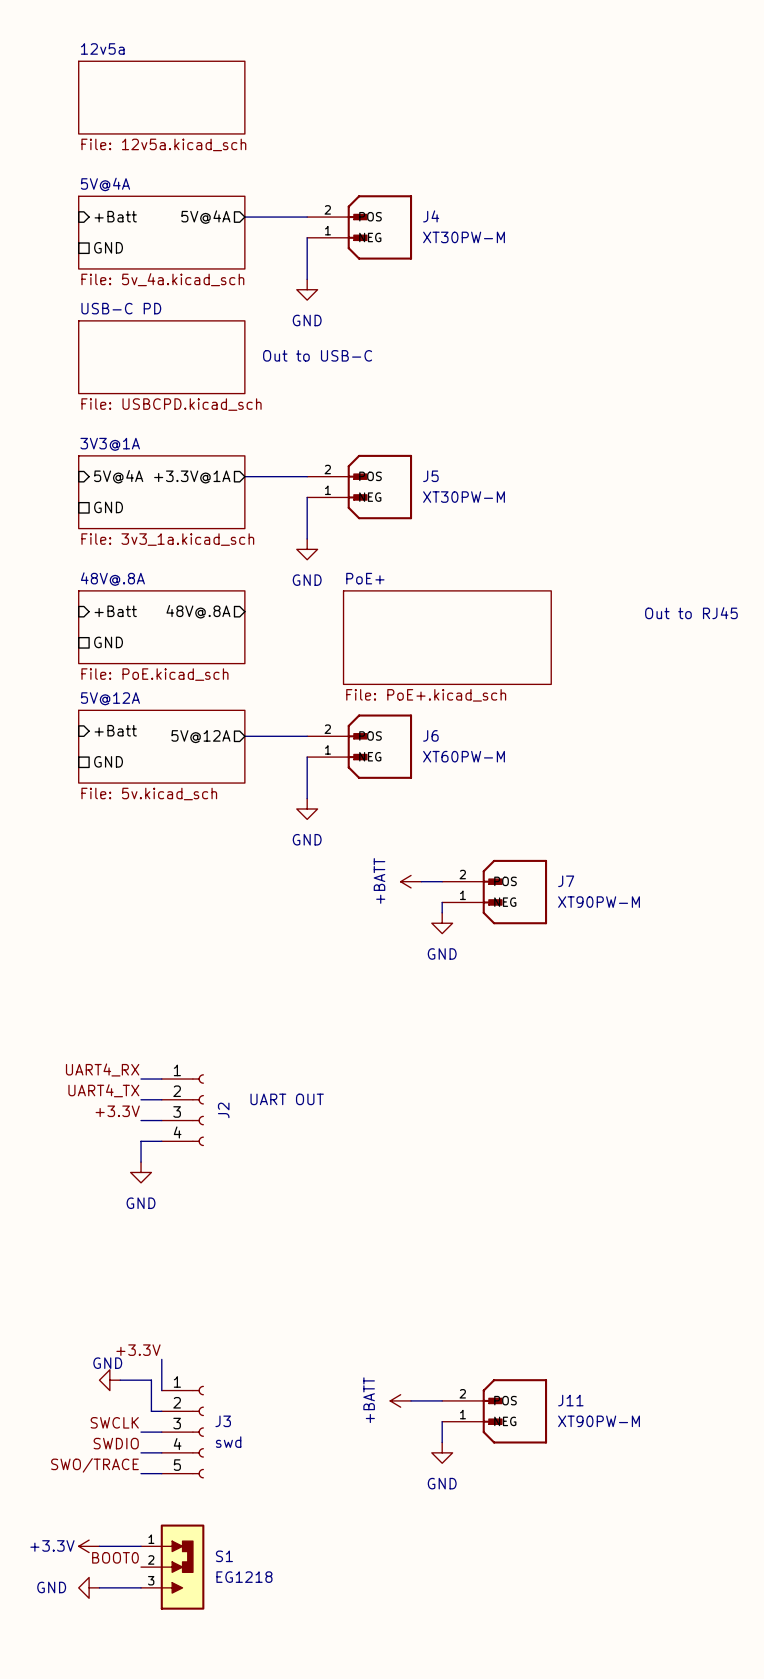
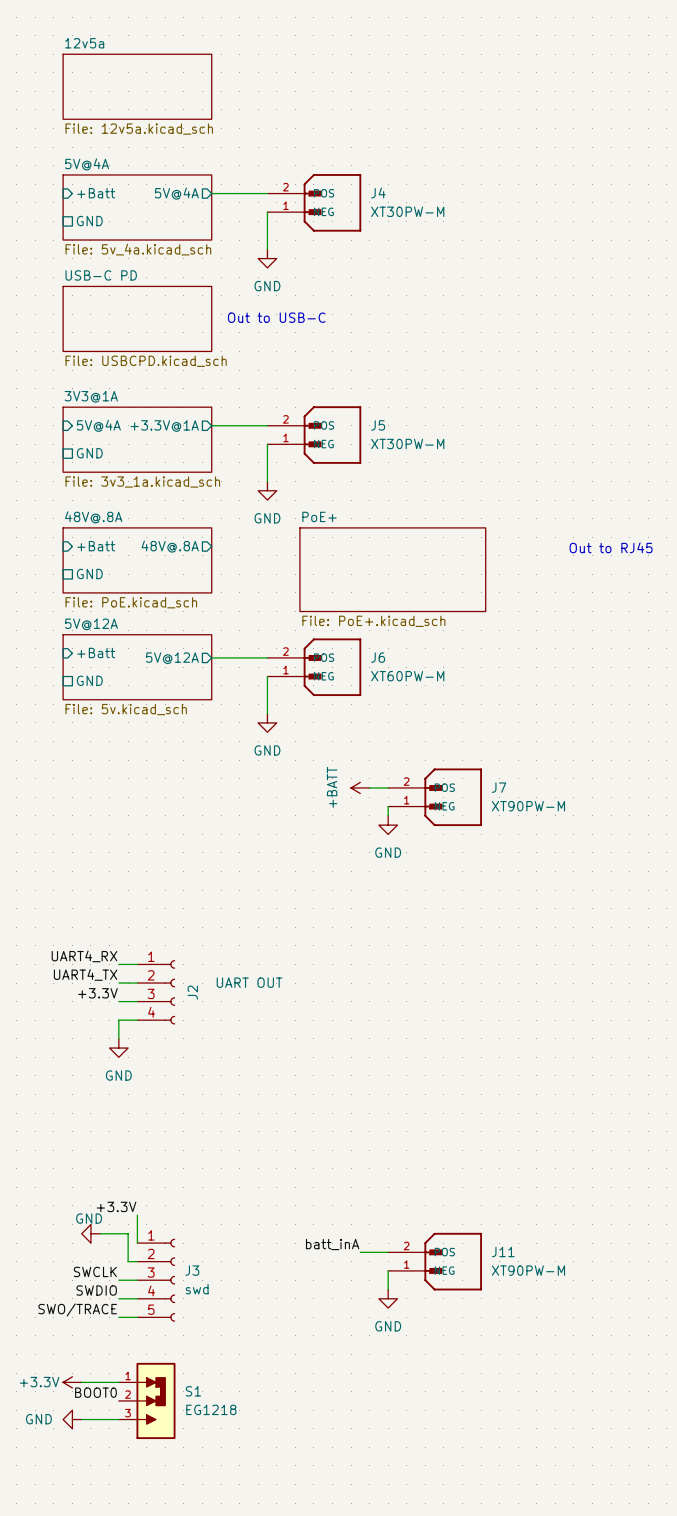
label: none -> batt_inA (332, 1244)
power symbol: +BATT (400, 1400) -> none

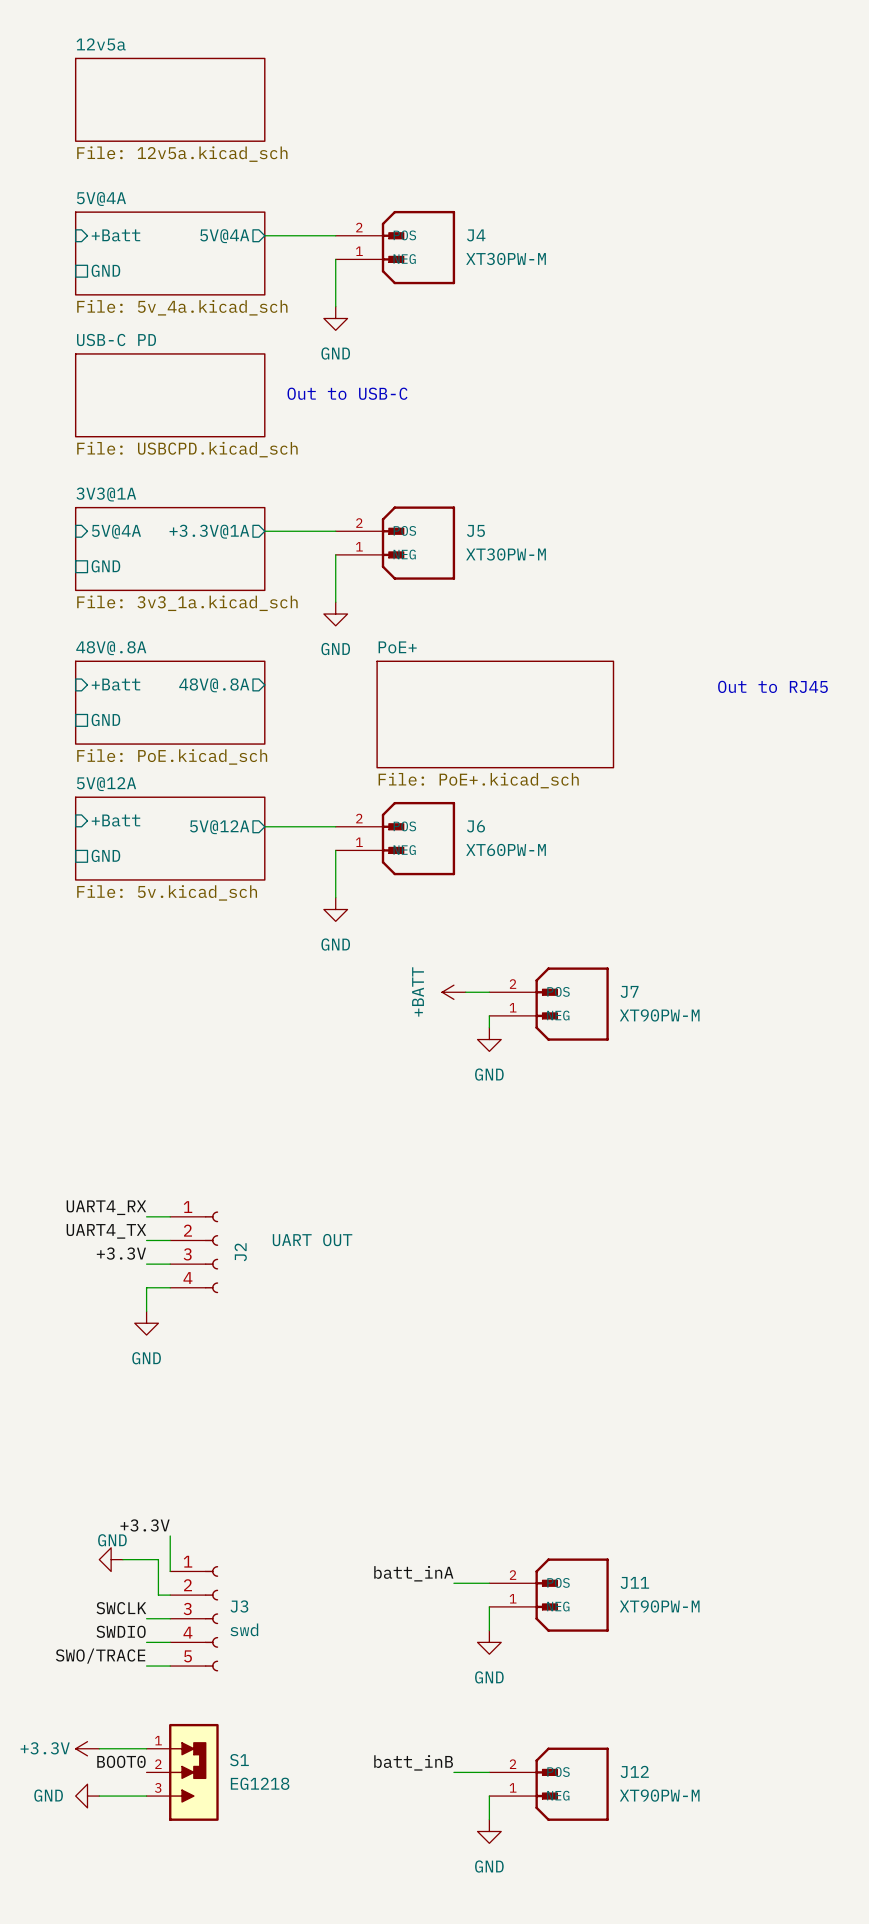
label: none -> batt_inB (413, 1762)
wire: none -> (453, 1772) (489, 1772)
J12: none -> XT90PW-M (549, 1784)
wire: none -> (489, 1796) (489, 1819)
power symbol: none -> GND (489, 1831)

